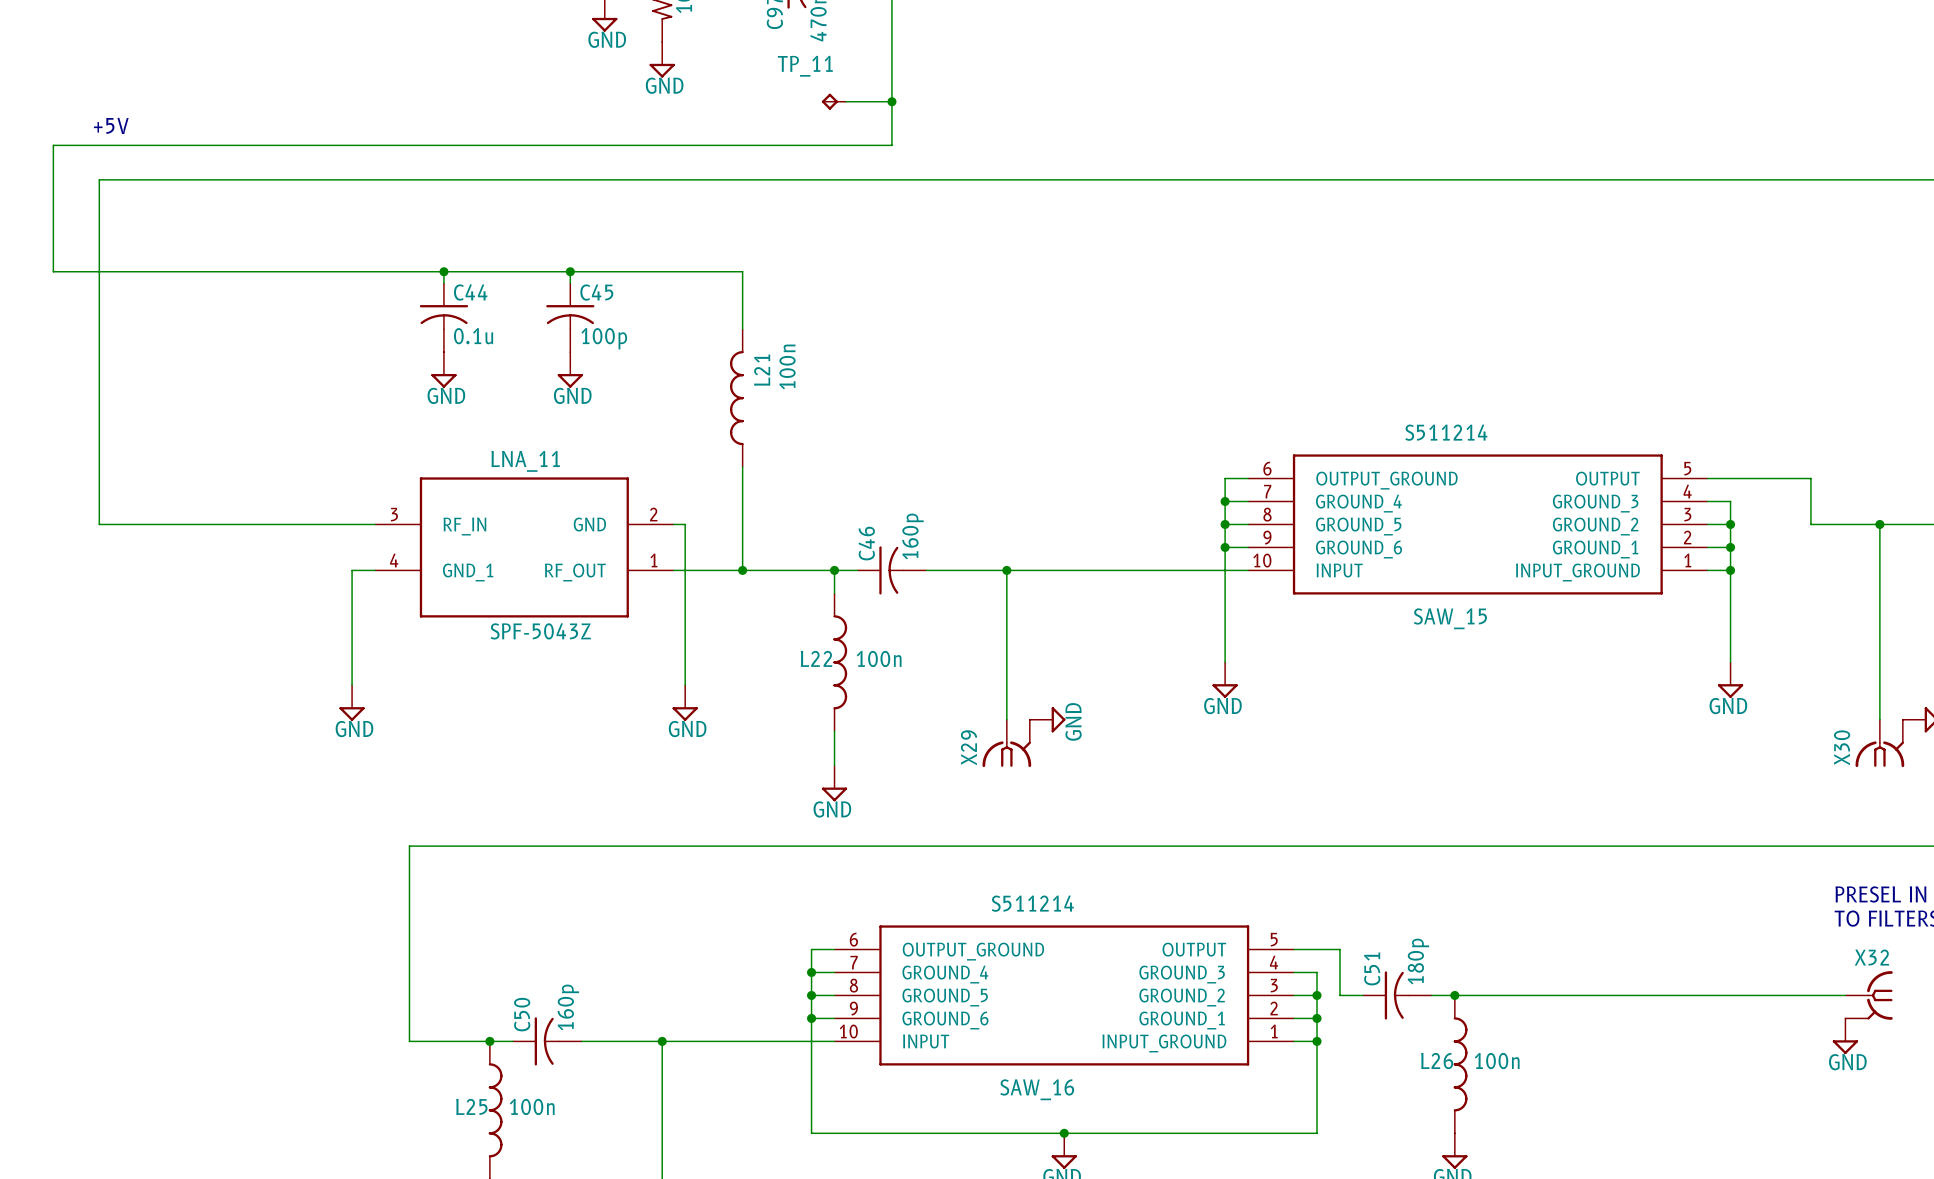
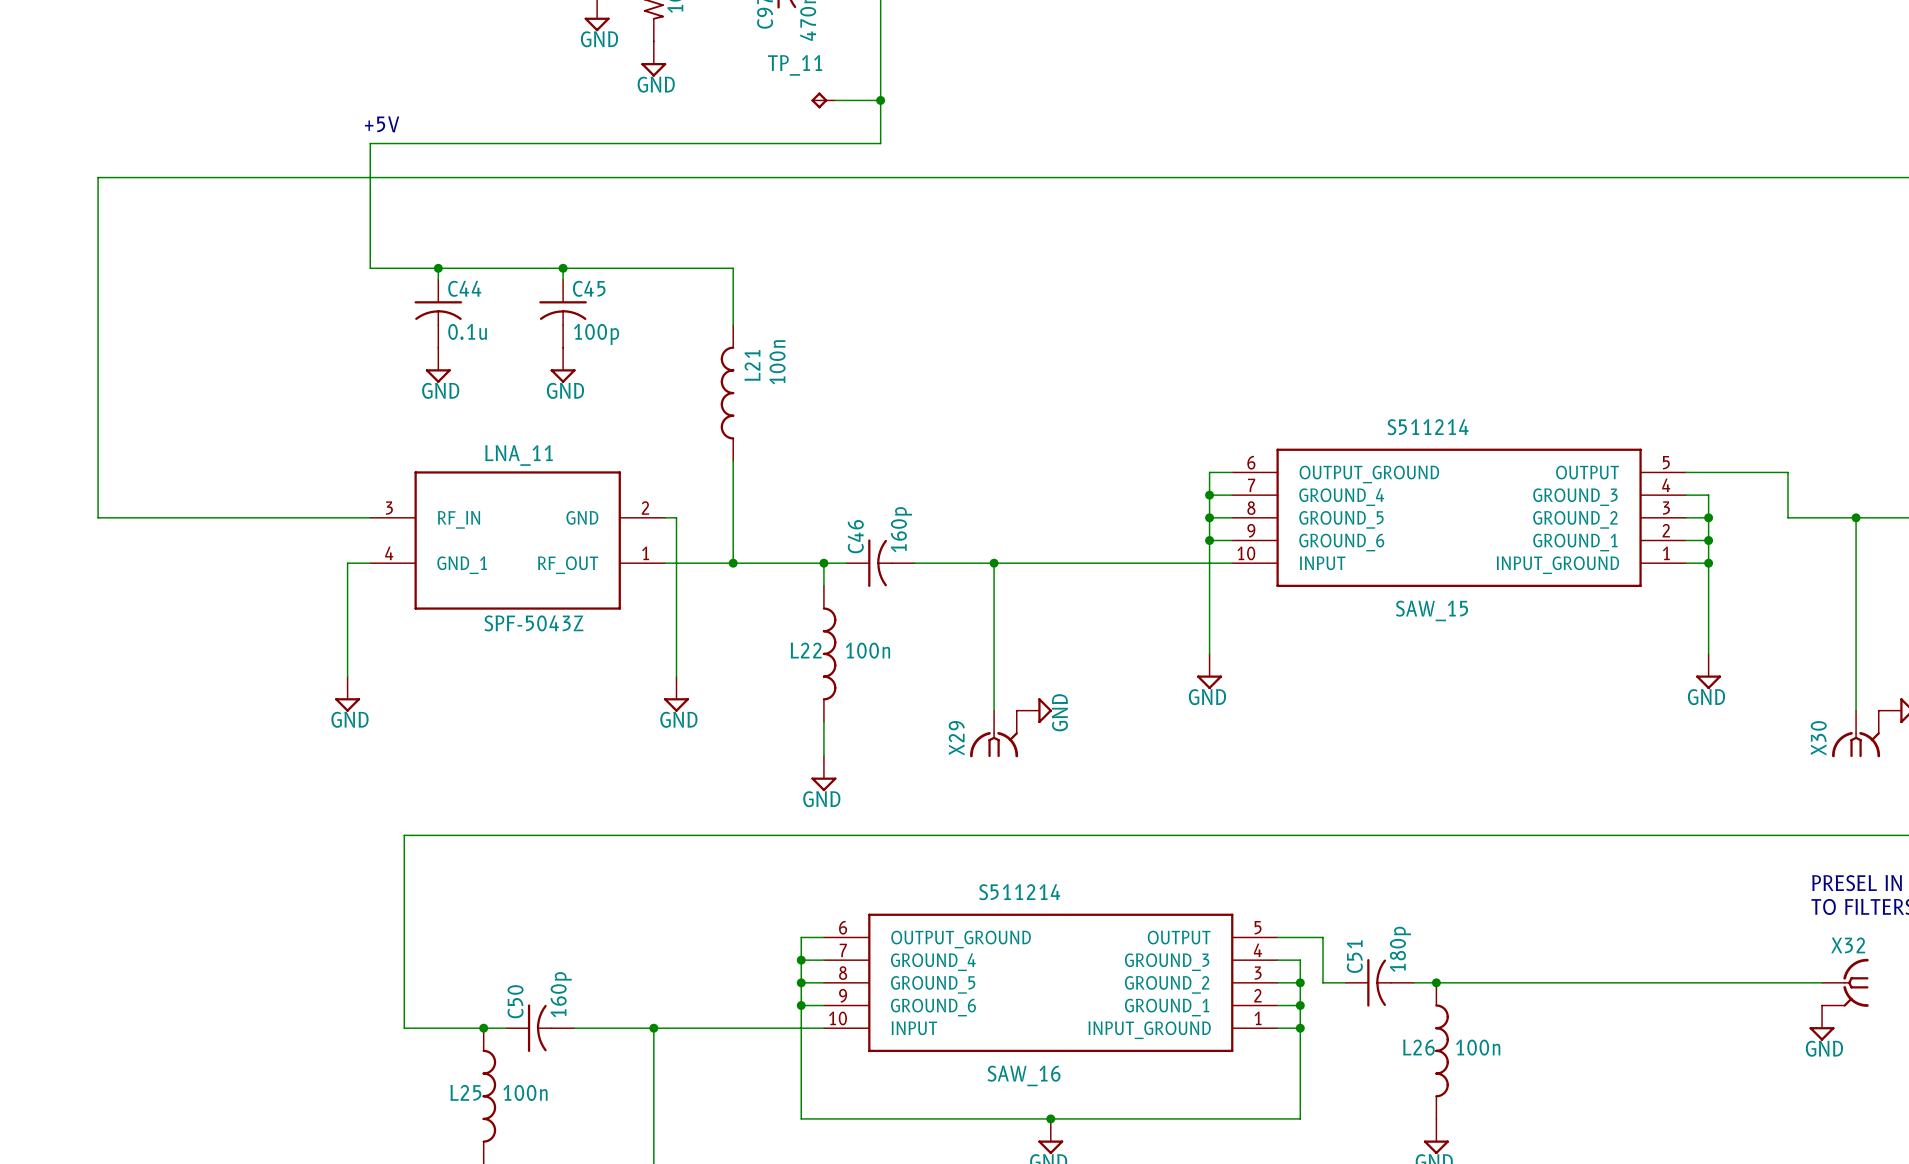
text: +5V (111, 125) -> none
text: none -> +5V (382, 124)
wire: (375, 145) (53, 145) (53, 271) (375, 271) -> (370, 143) (370, 268)

